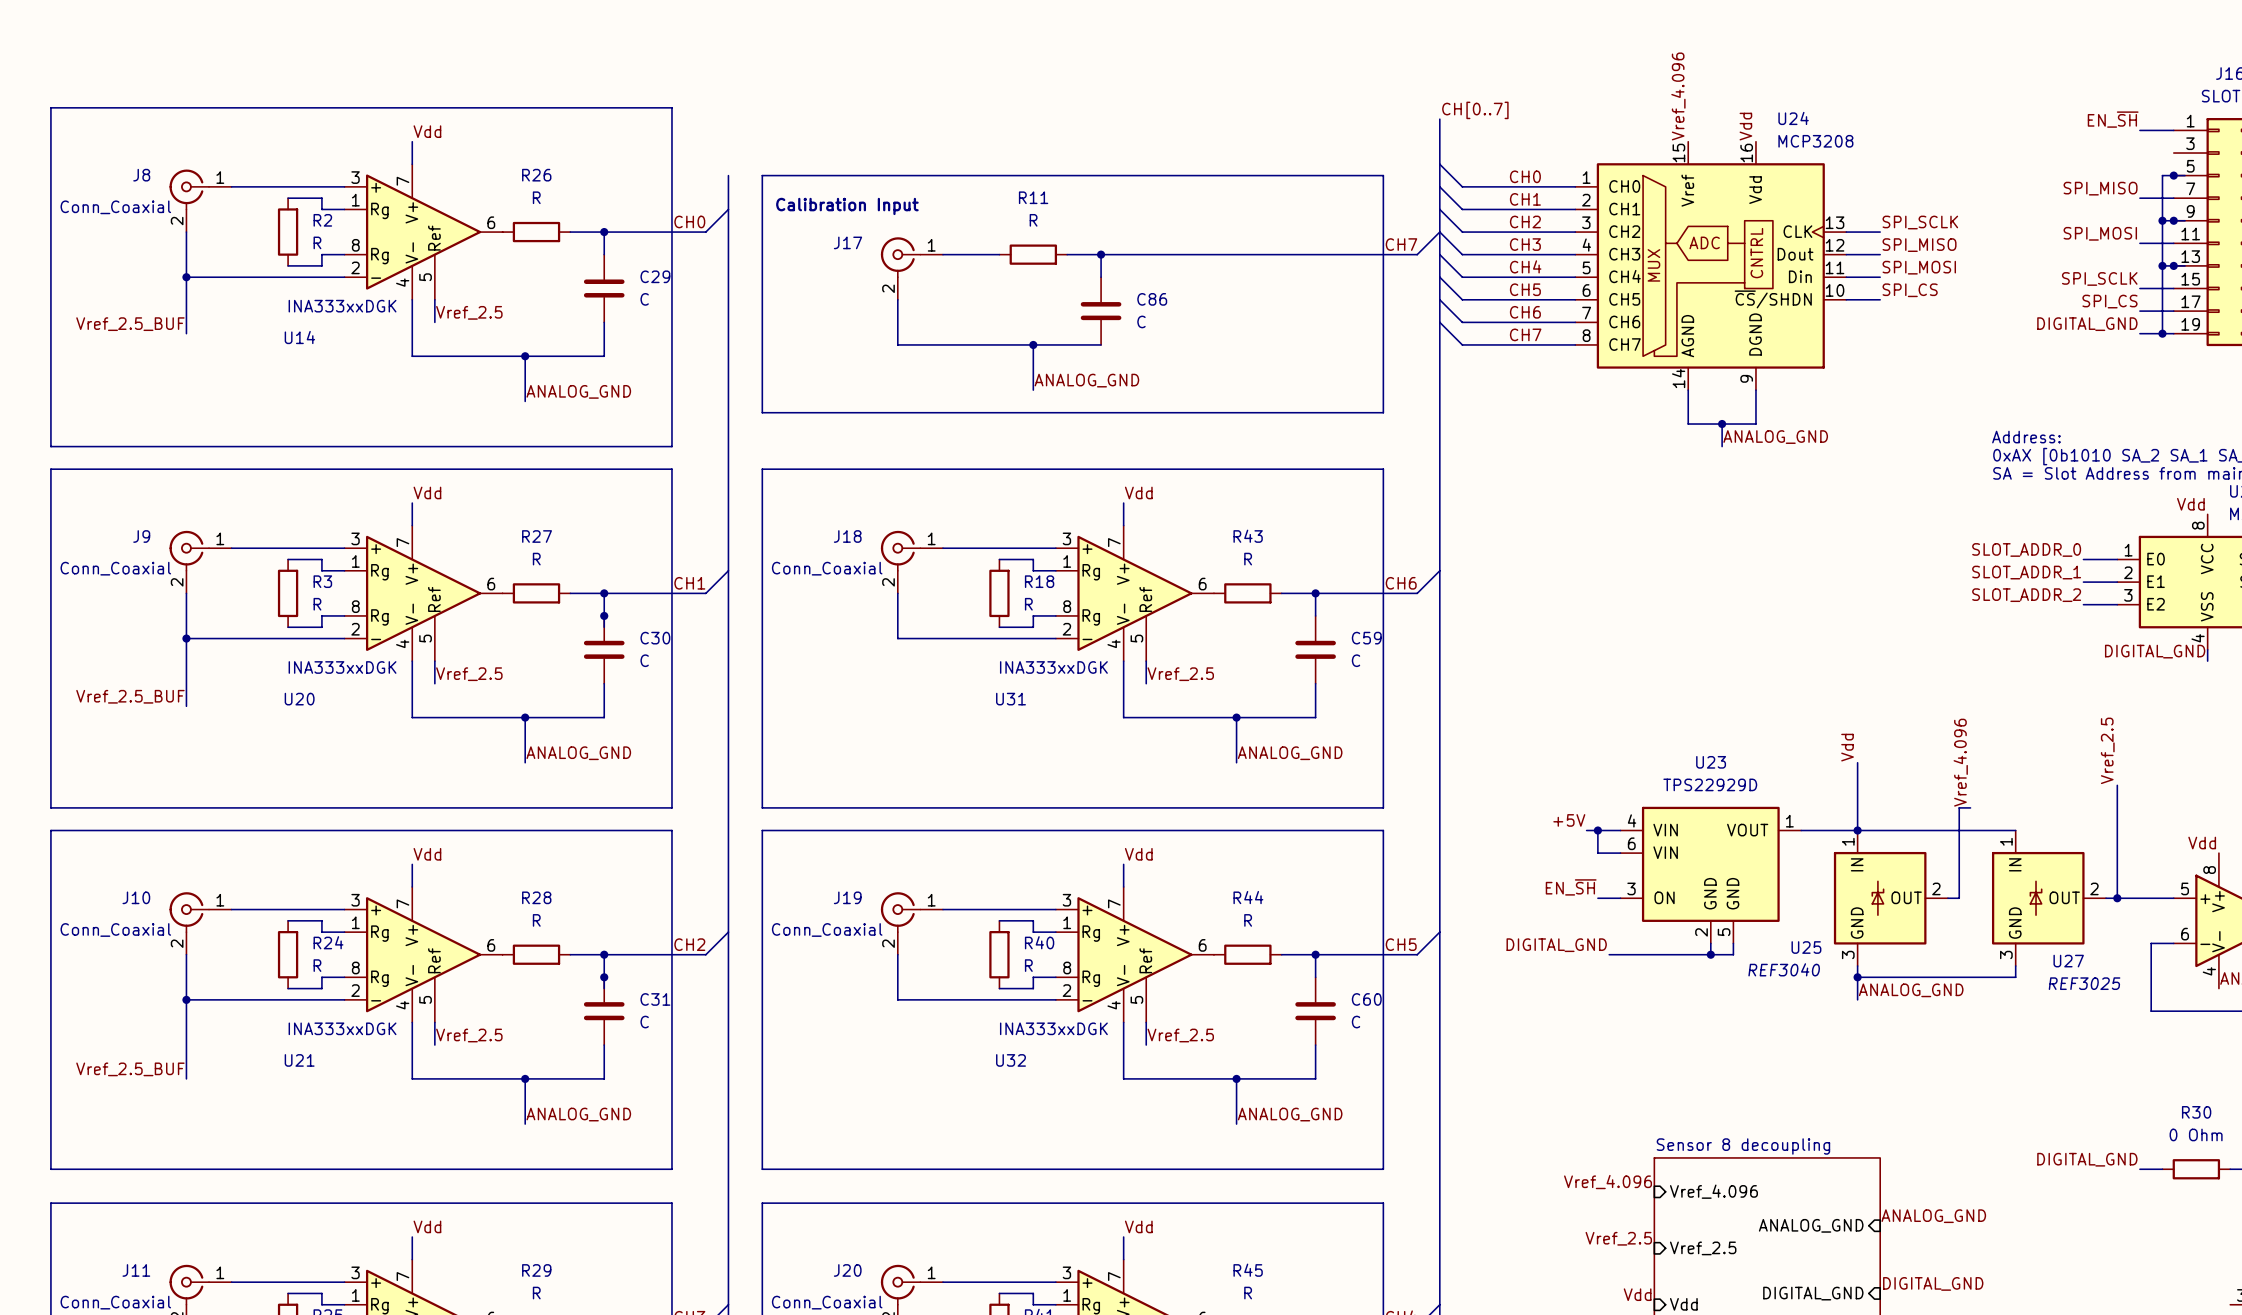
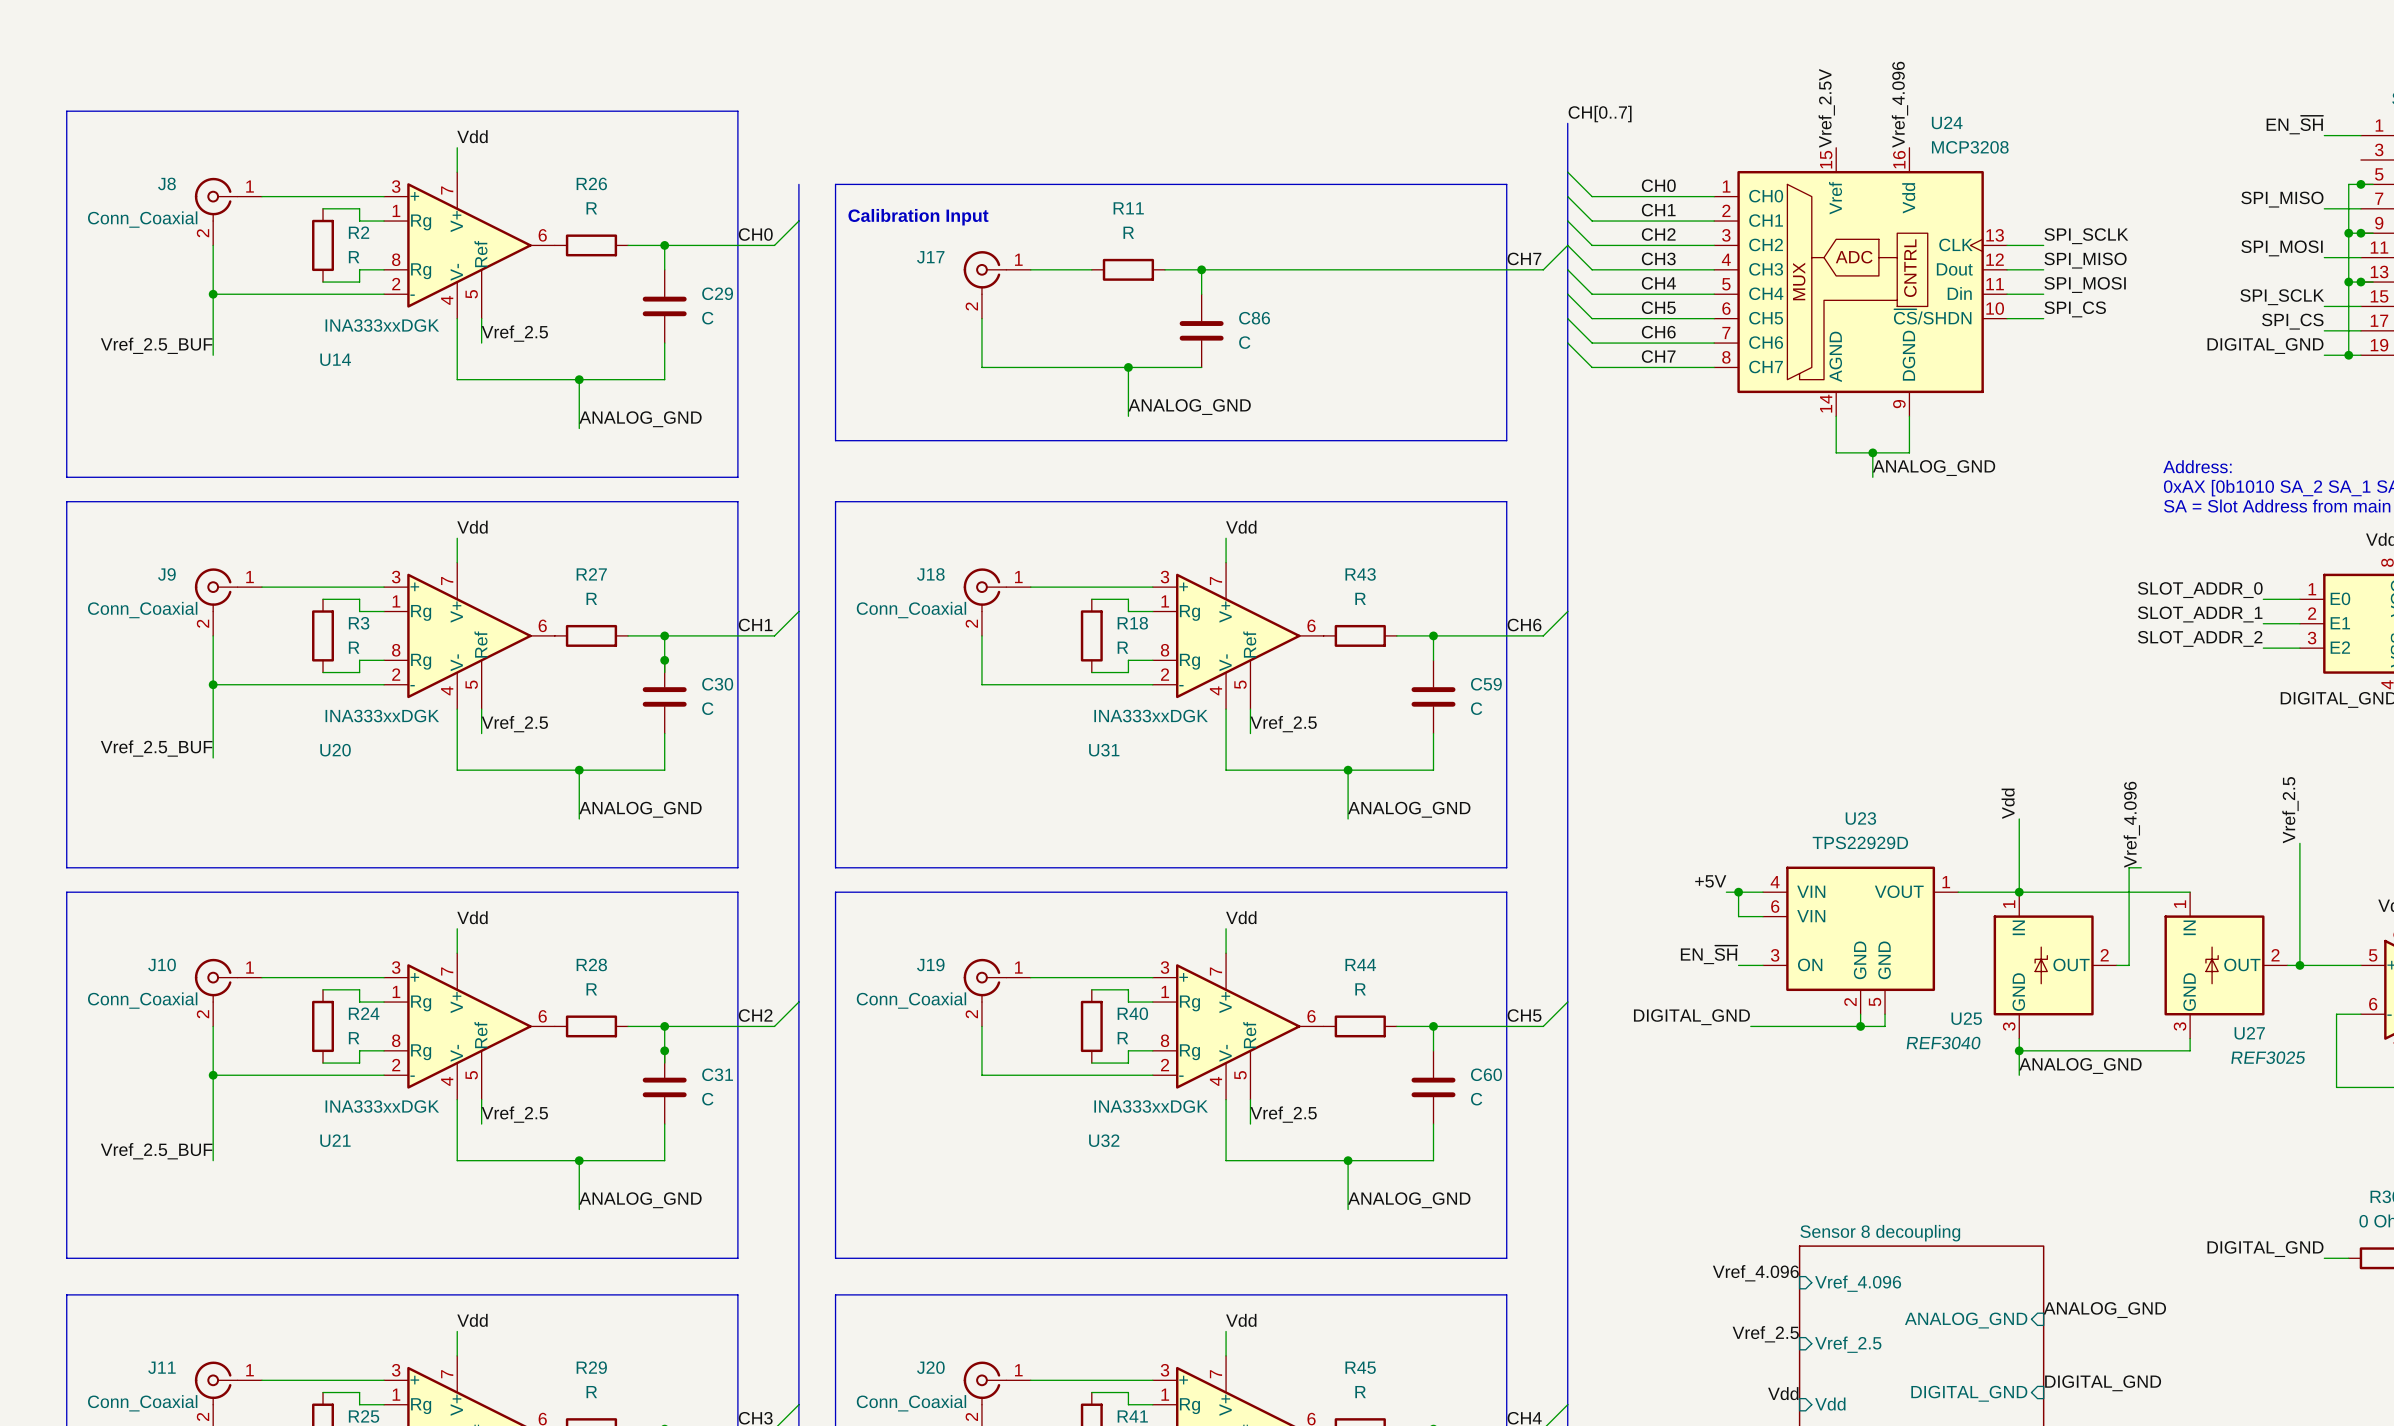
label: Vref_4.096 (1678, 96) -> Vref_2.5V (1826, 108)
label: Vdd (1745, 126) -> Vref_4.096 (1899, 104)

